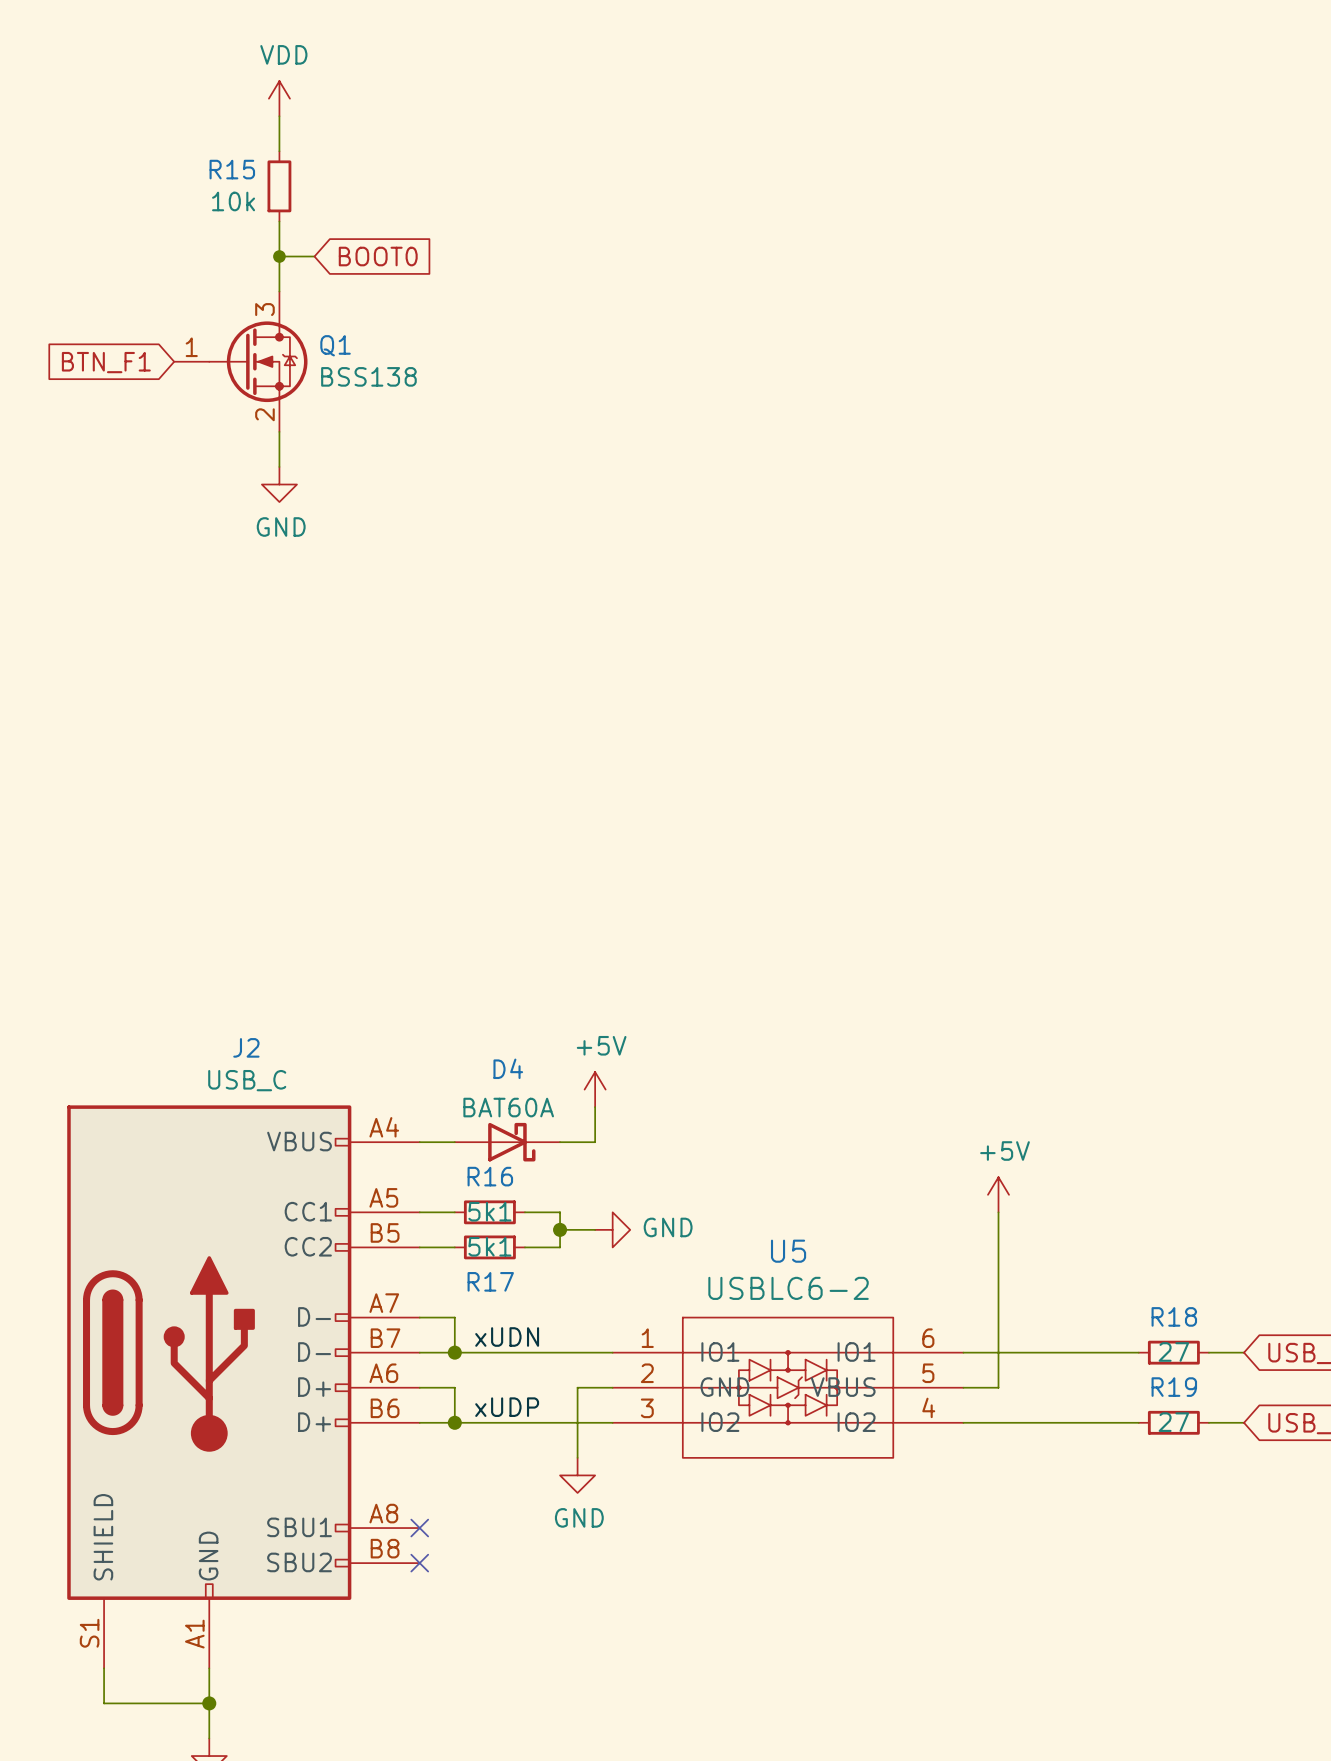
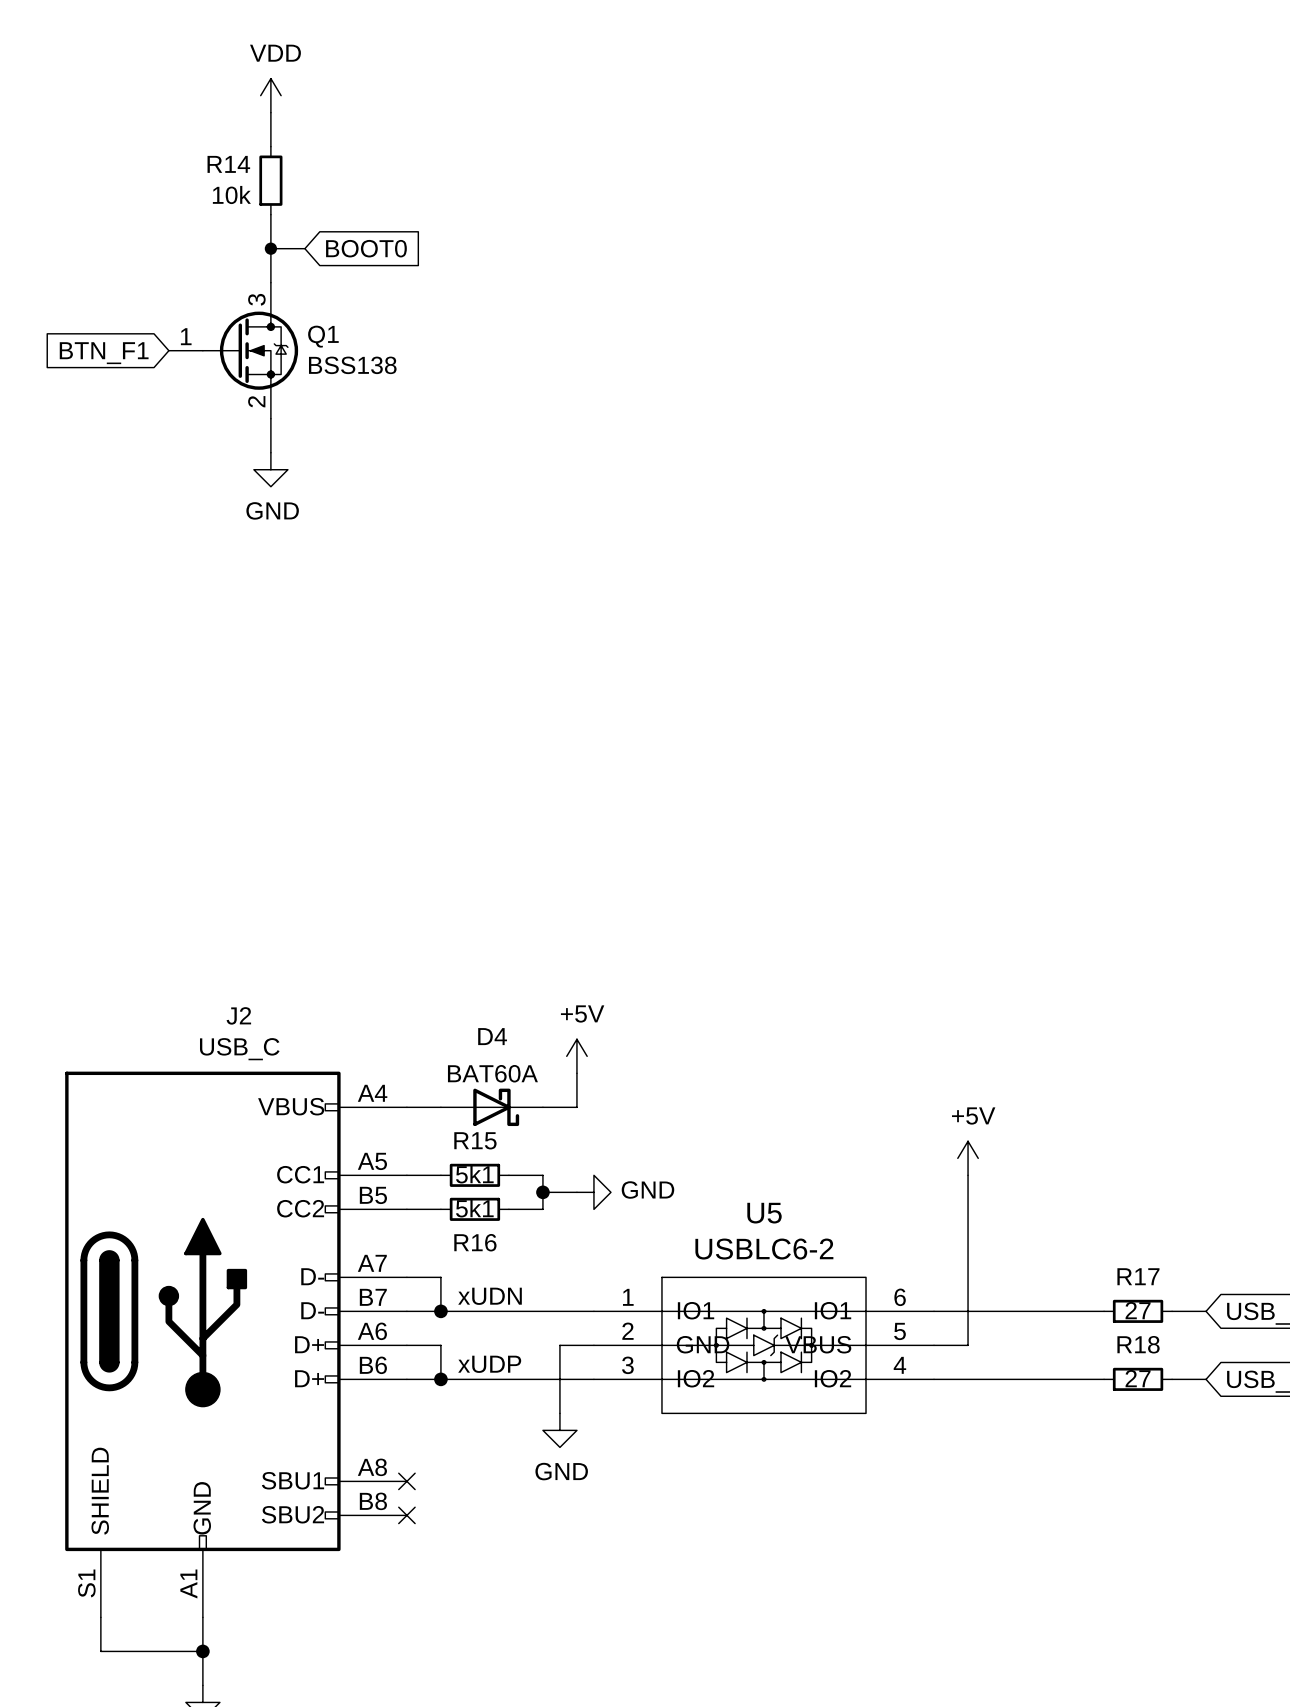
R15 name: R15 (232, 169) -> R14 (228, 164)
R16 name: R16 (490, 1176) -> R15 (475, 1140)
R17 name: R17 (490, 1281) -> R16 (475, 1242)
R18 name: R18 (1174, 1316) -> R17 (1138, 1276)
R19 name: R19 (1174, 1387) -> R18 (1138, 1344)

